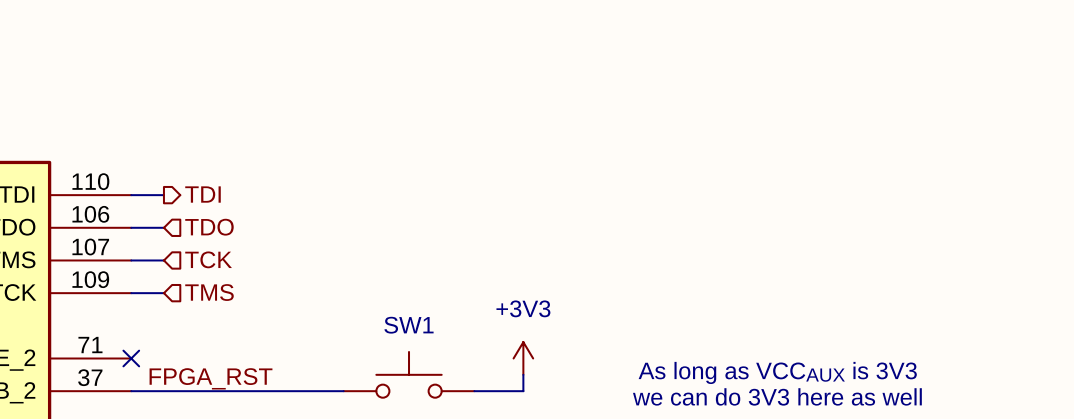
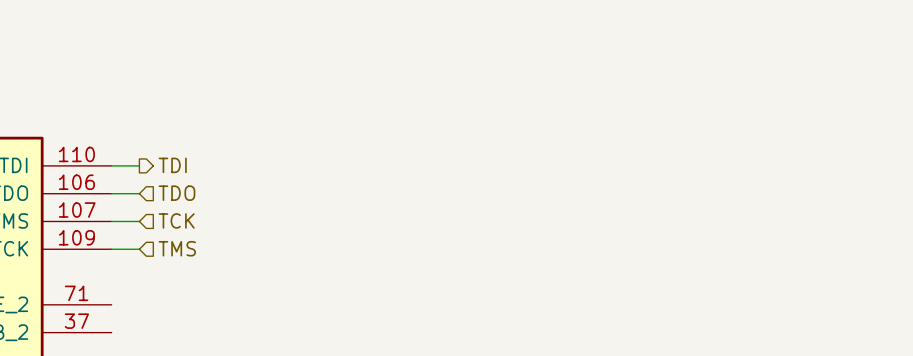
no-connect mark: (131, 358) -> none
power symbol: +3V3 (523, 358) -> none
text: As long as VCCAUX is 3V3 (777, 372) -> none
SW1: (409, 374) -> none
wire: (523, 374) (523, 391) (474, 391) -> none
label: FPGA_RST (211, 378) -> none
wire: (131, 391) (343, 391) -> none
text: we can do 3V3 here as well (777, 396) -> none

